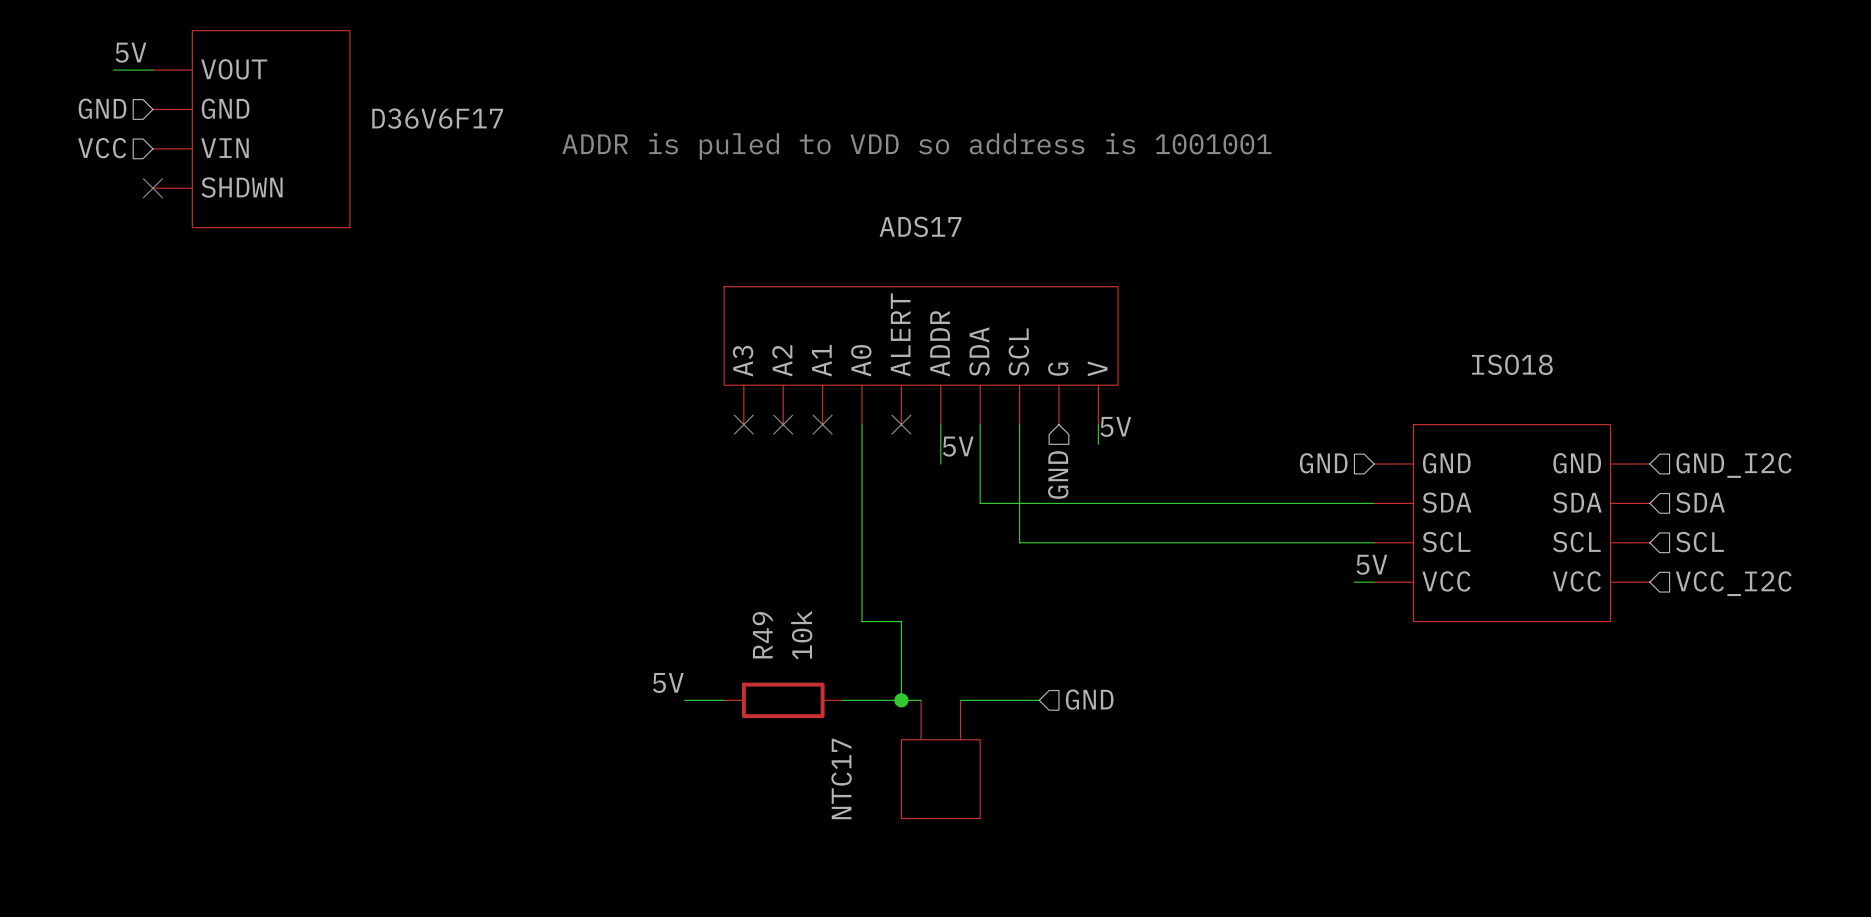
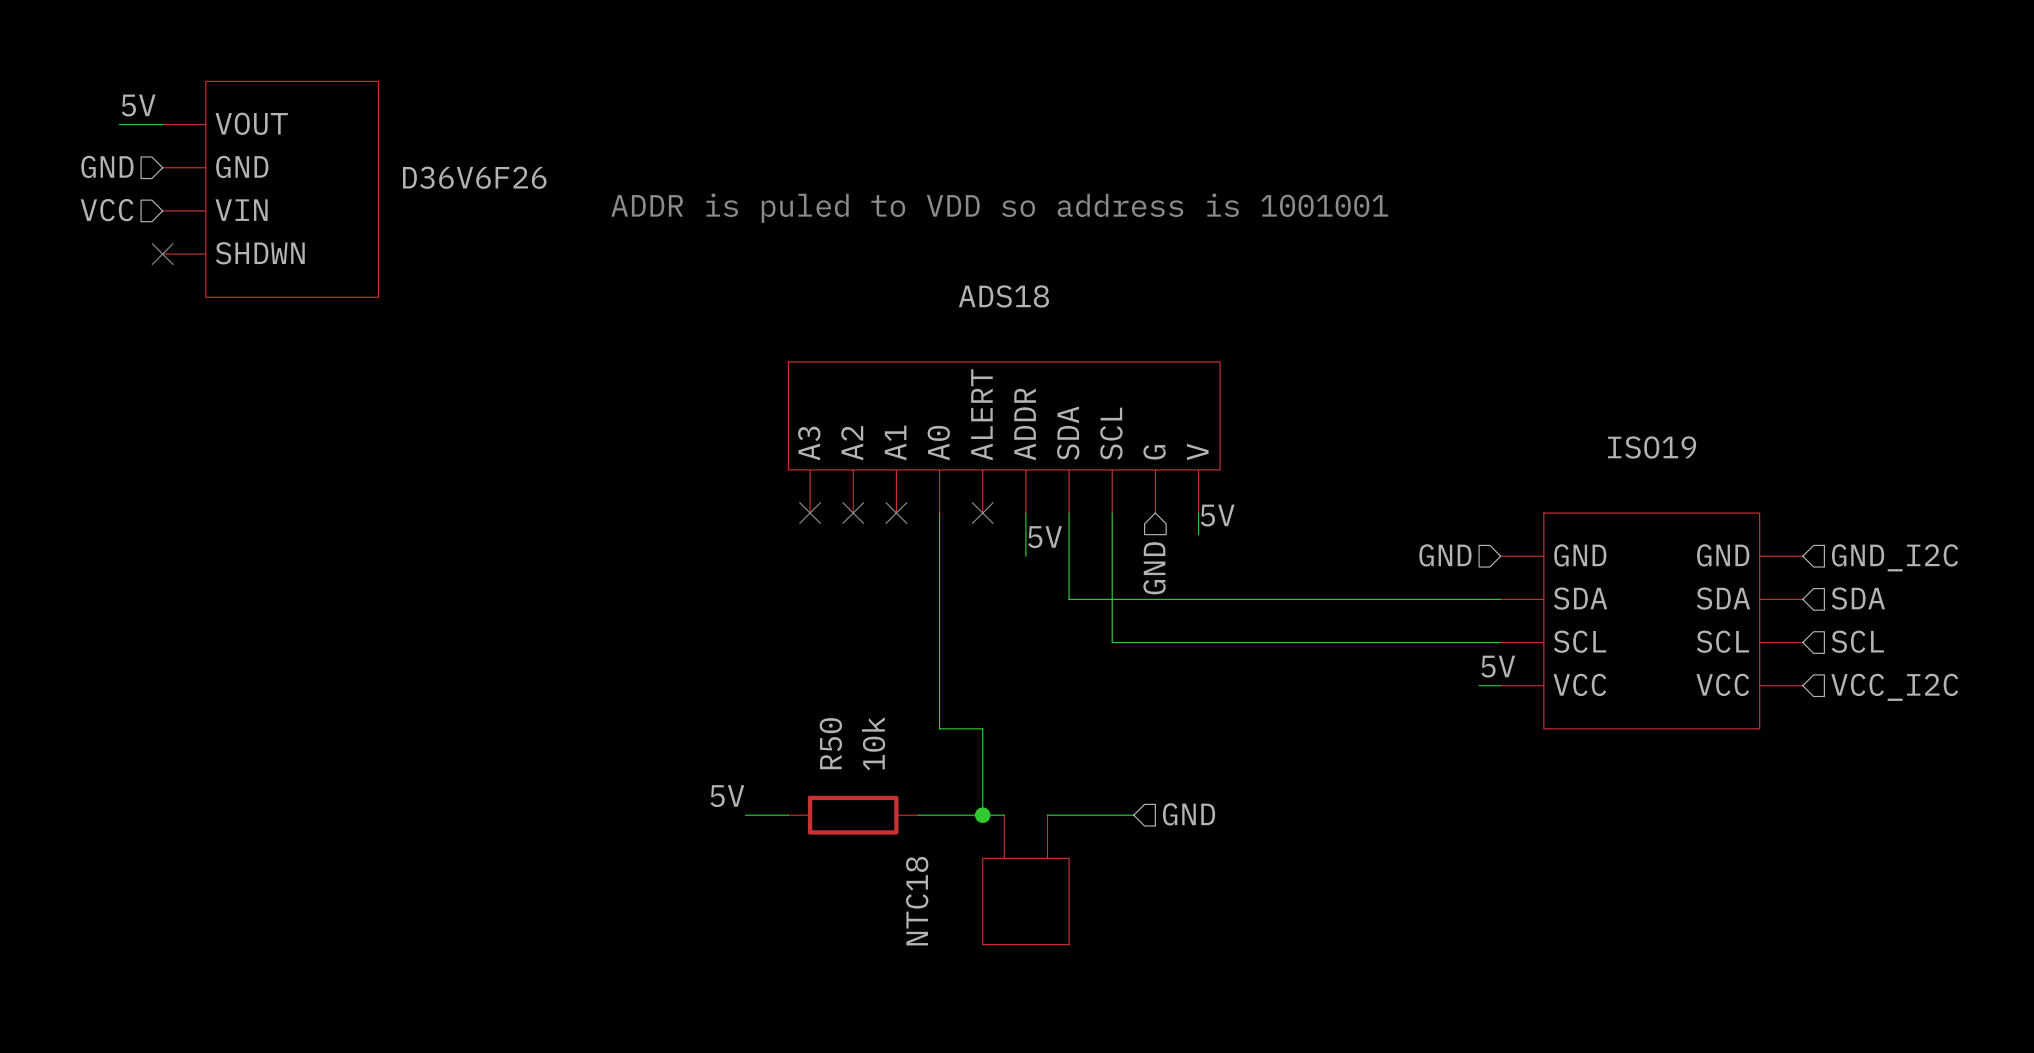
D36V6F17 name: D36V6F17 (437, 118) -> D36V6F26 (474, 177)
ADS17 name: ADS17 (920, 226) -> ADS18 (1003, 296)
ISO18 name: ISO18 (1512, 364) -> ISO19 (1652, 447)
R49 name: R49 (762, 635) -> R50 (830, 743)
NTC17 name: NTC17 (841, 779) -> NTC18 (917, 901)

